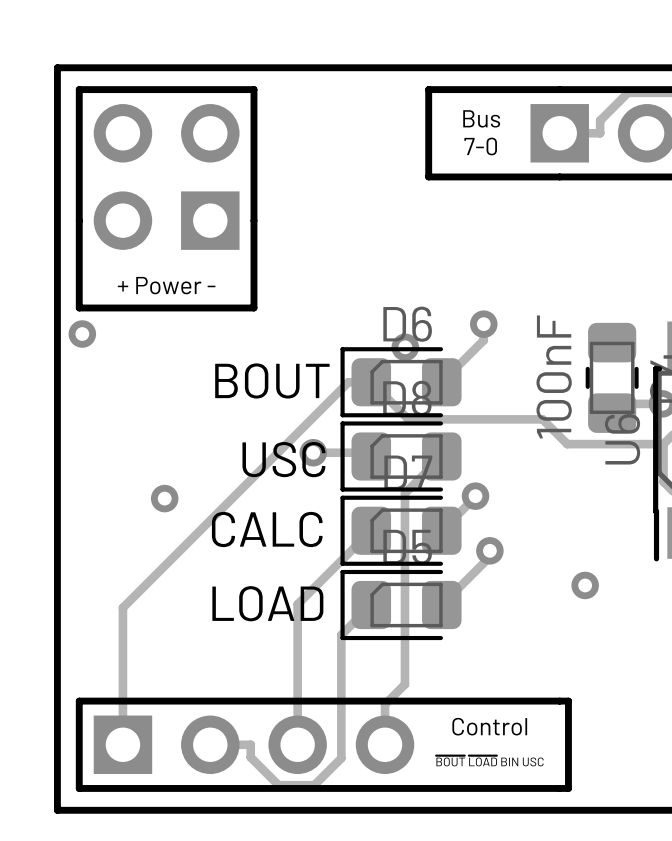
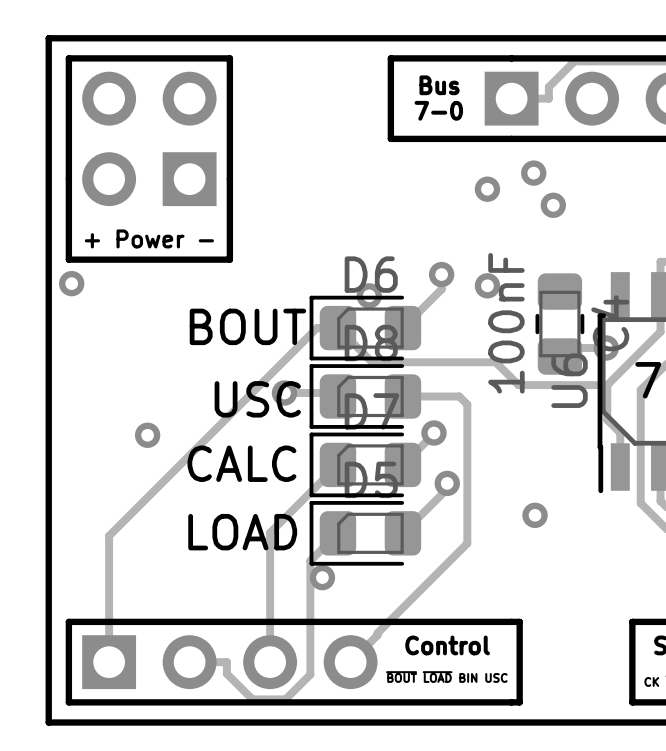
via: none -> (533, 173)
via: none -> (487, 189)
via: none -> (553, 205)
via: none -> (487, 285)
track: (441, 456) (404, 493) (404, 684) (385, 704) (385, 744) -> (402, 396) (459, 396) (467, 404) (467, 543) (350, 662)
via: none -> (322, 577)

